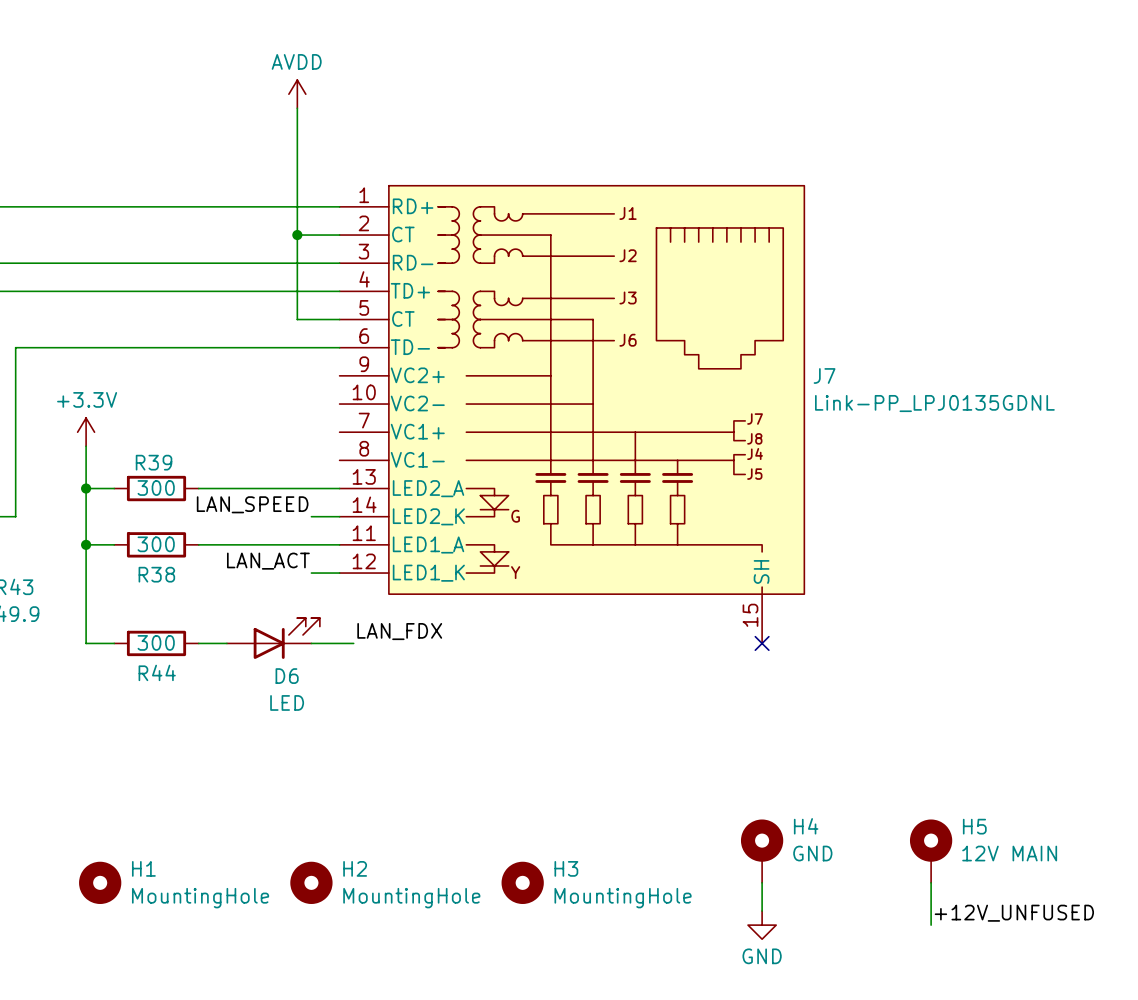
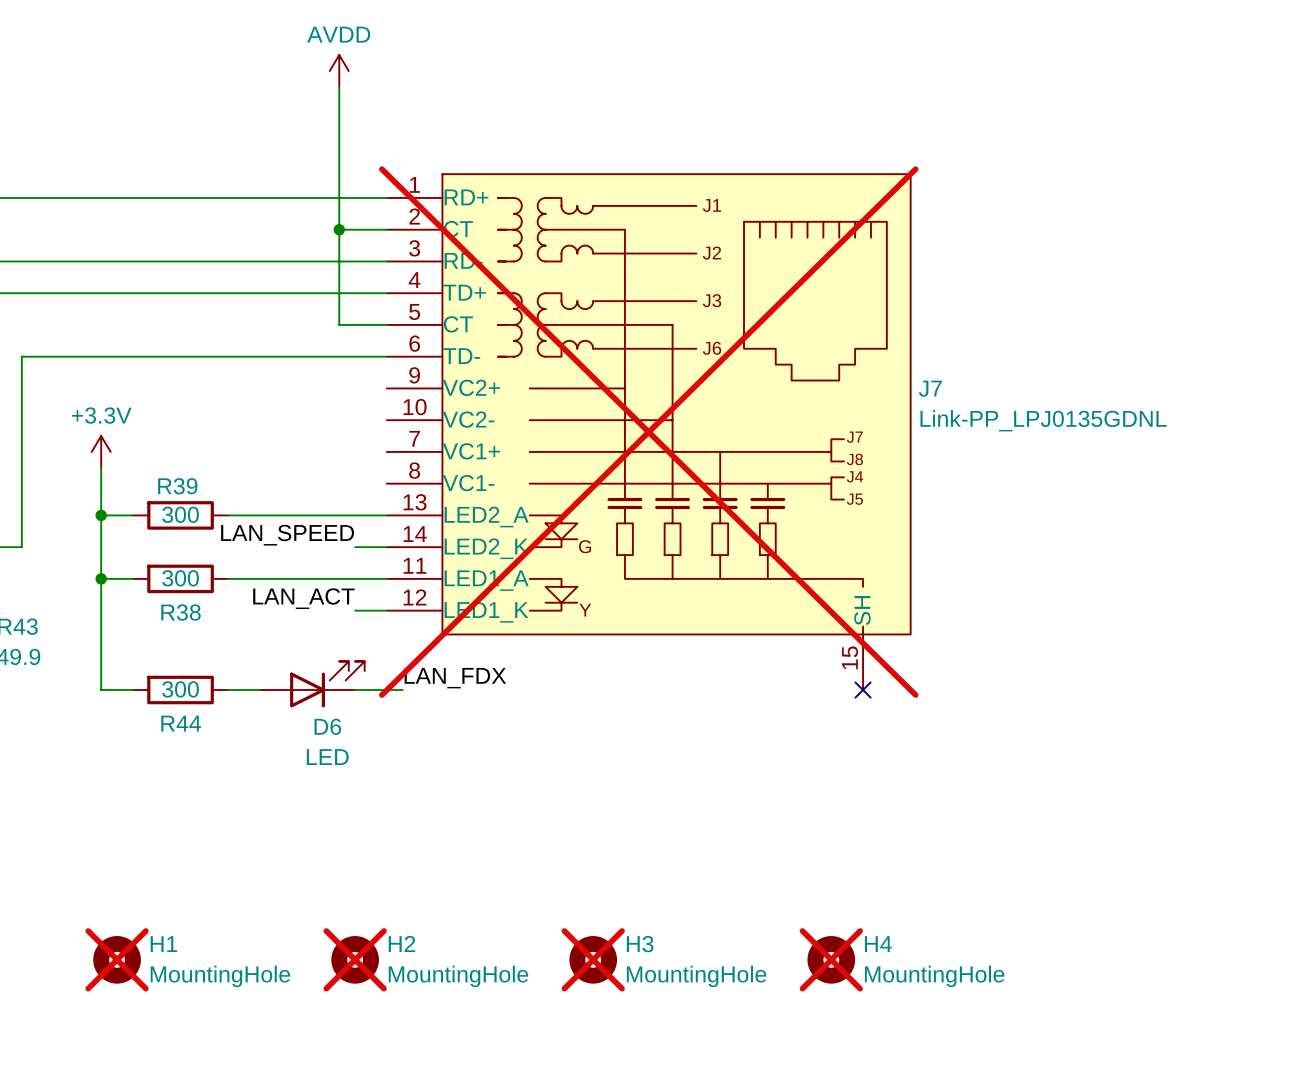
J7 do-not-place cross: none -> (648, 432)
H4 symbol: [740, 819, 784, 883] -> [807, 936, 856, 984]
H5: 12V MAIN (931, 851) -> none
H4 value: GND (812, 853) -> MountingHole (934, 976)
H1 do-not-place cross: none -> (117, 959)
H2 do-not-place cross: none -> (355, 959)
H3 do-not-place cross: none -> (593, 959)
H4 do-not-place cross: none -> (831, 959)
wire: (762, 882) (762, 911) -> none
wire: (931, 882) (931, 925) -> none
label: +12V_UNFUSED (1014, 913) -> none
power symbol: GND (762, 925) -> none

